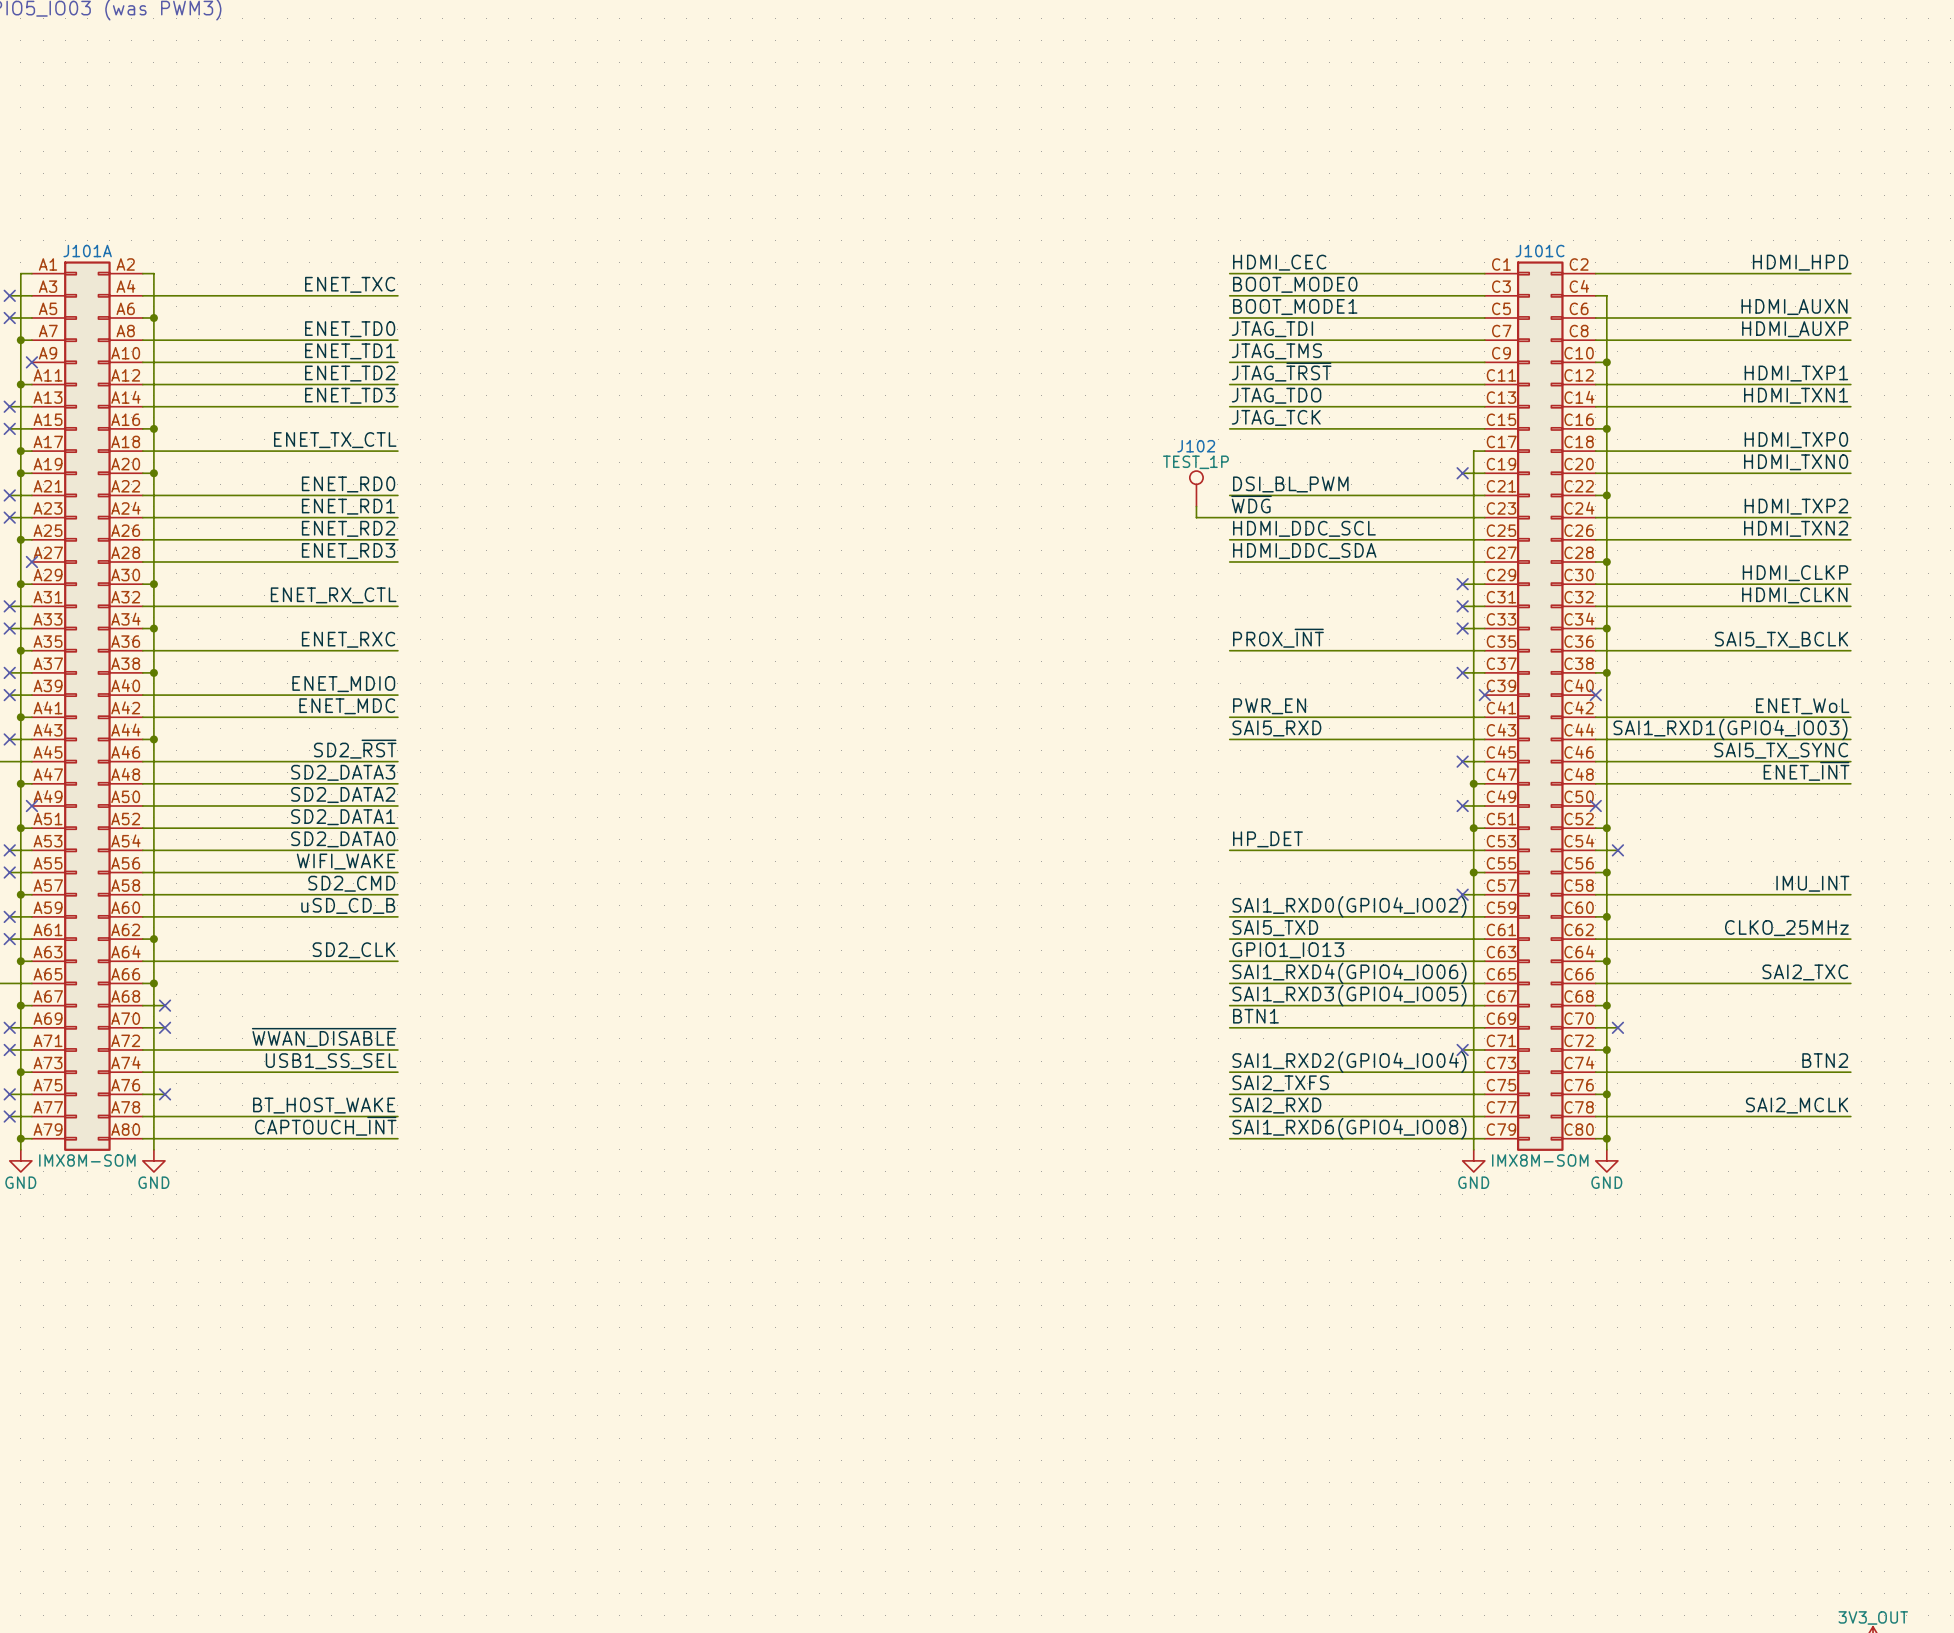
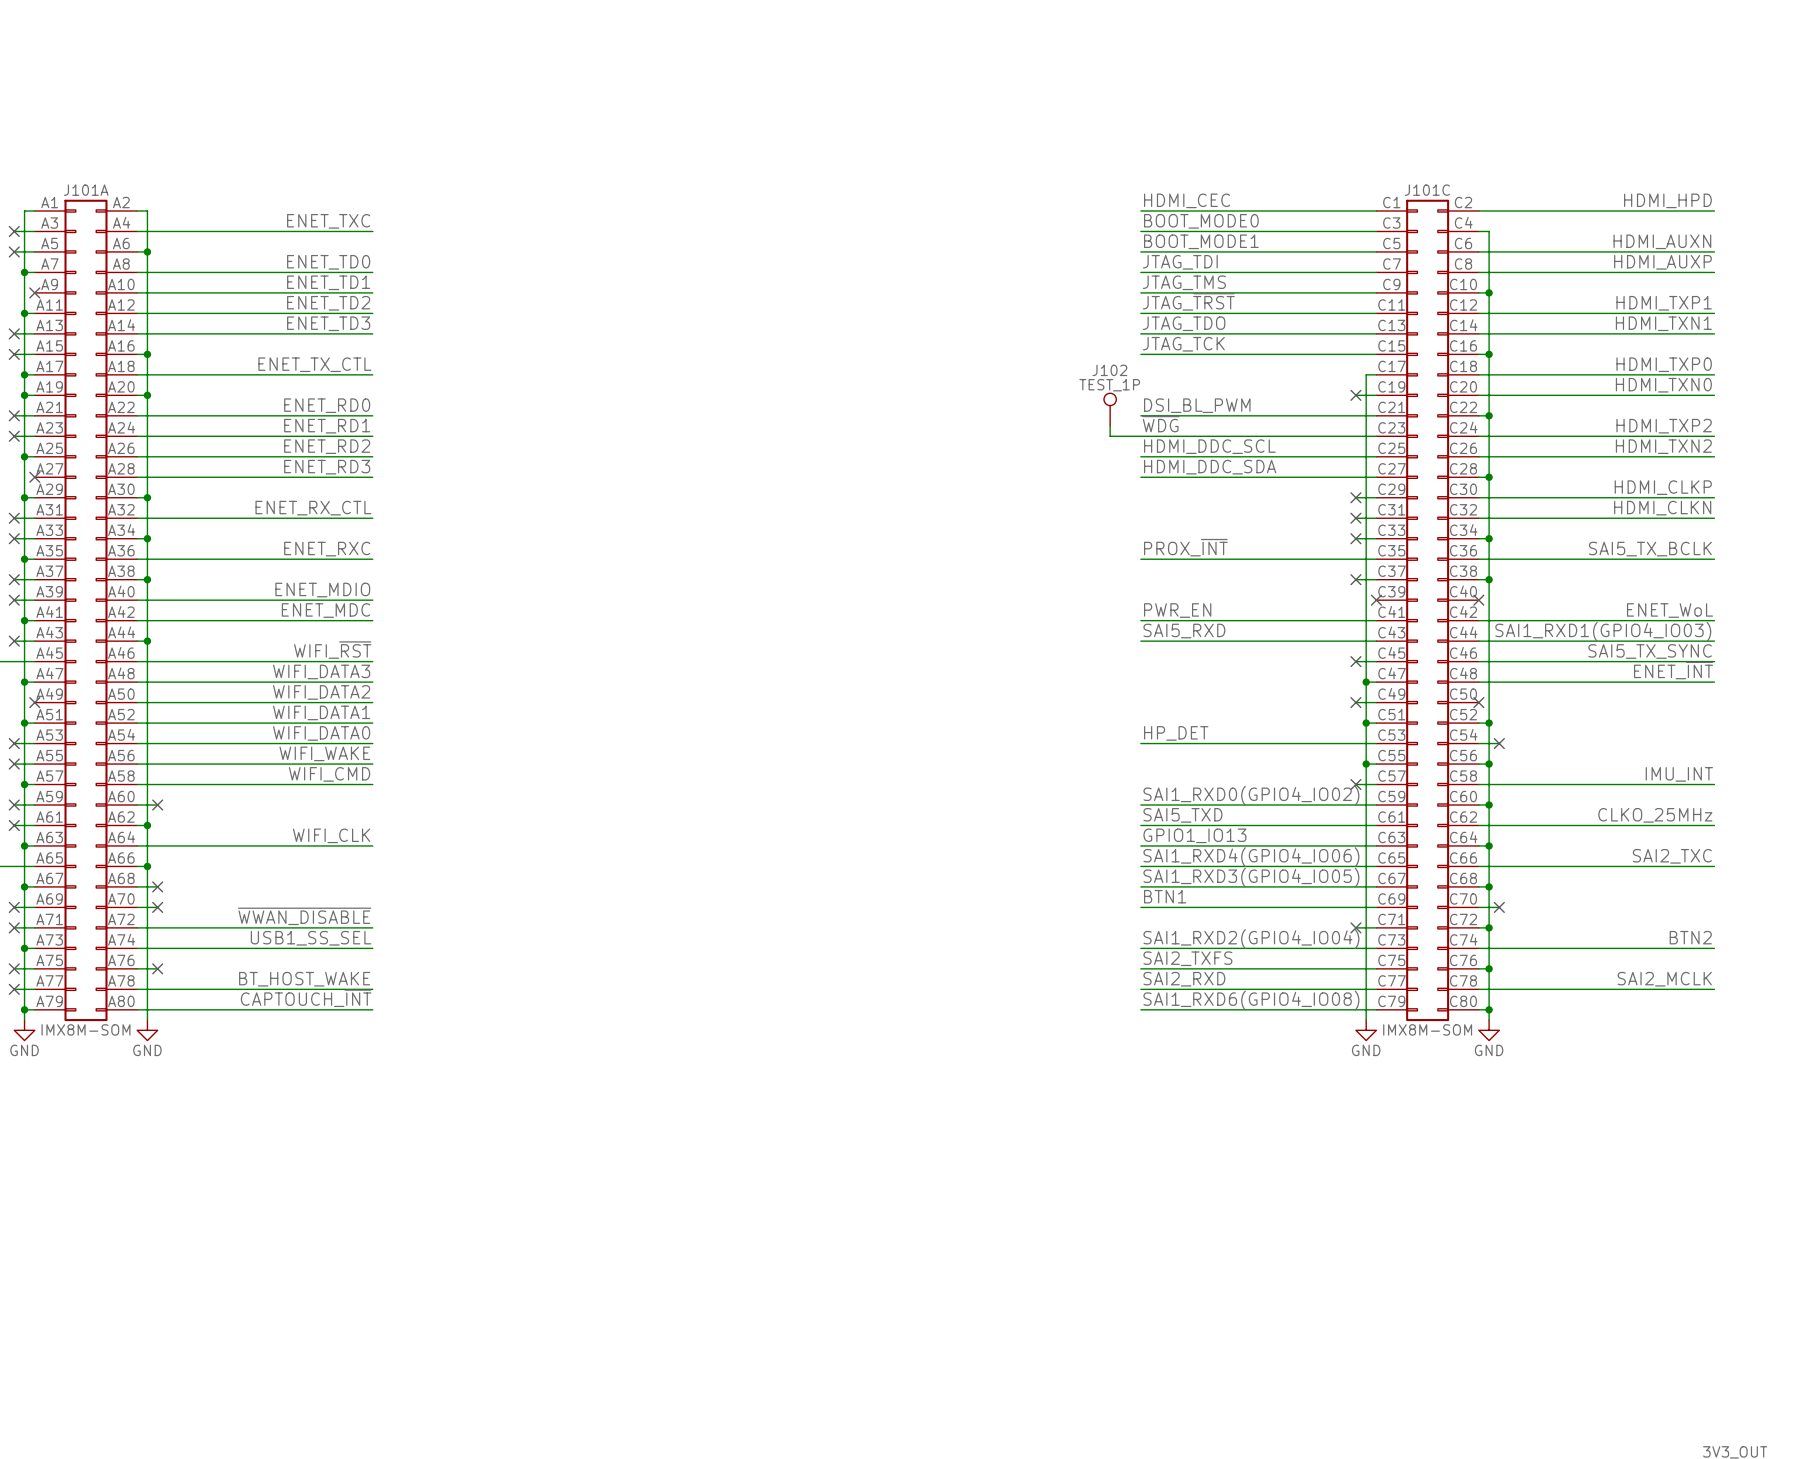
label: SD2_~{RST} (355, 749) -> WIFI_~{RST} (332, 650)
label: SD2_DATA3 (343, 772) -> WIFI_DATA3 (321, 671)
label: SD2_DATA2 (343, 795) -> WIFI_DATA2 (321, 692)
label: SD2_DATA1 (343, 817) -> WIFI_DATA1 (321, 712)
label: SD2_DATA0 (343, 839) -> WIFI_DATA0 (321, 733)
label: SD2_CMD (351, 883) -> WIFI_CMD (329, 774)
label: uSD_CD_B (348, 905) -> none
wire: (165, 916) (397, 916) -> none
no-connect mark: none -> (157, 805)
label: SD2_CLK (353, 950) -> WIFI_CLK (331, 835)

